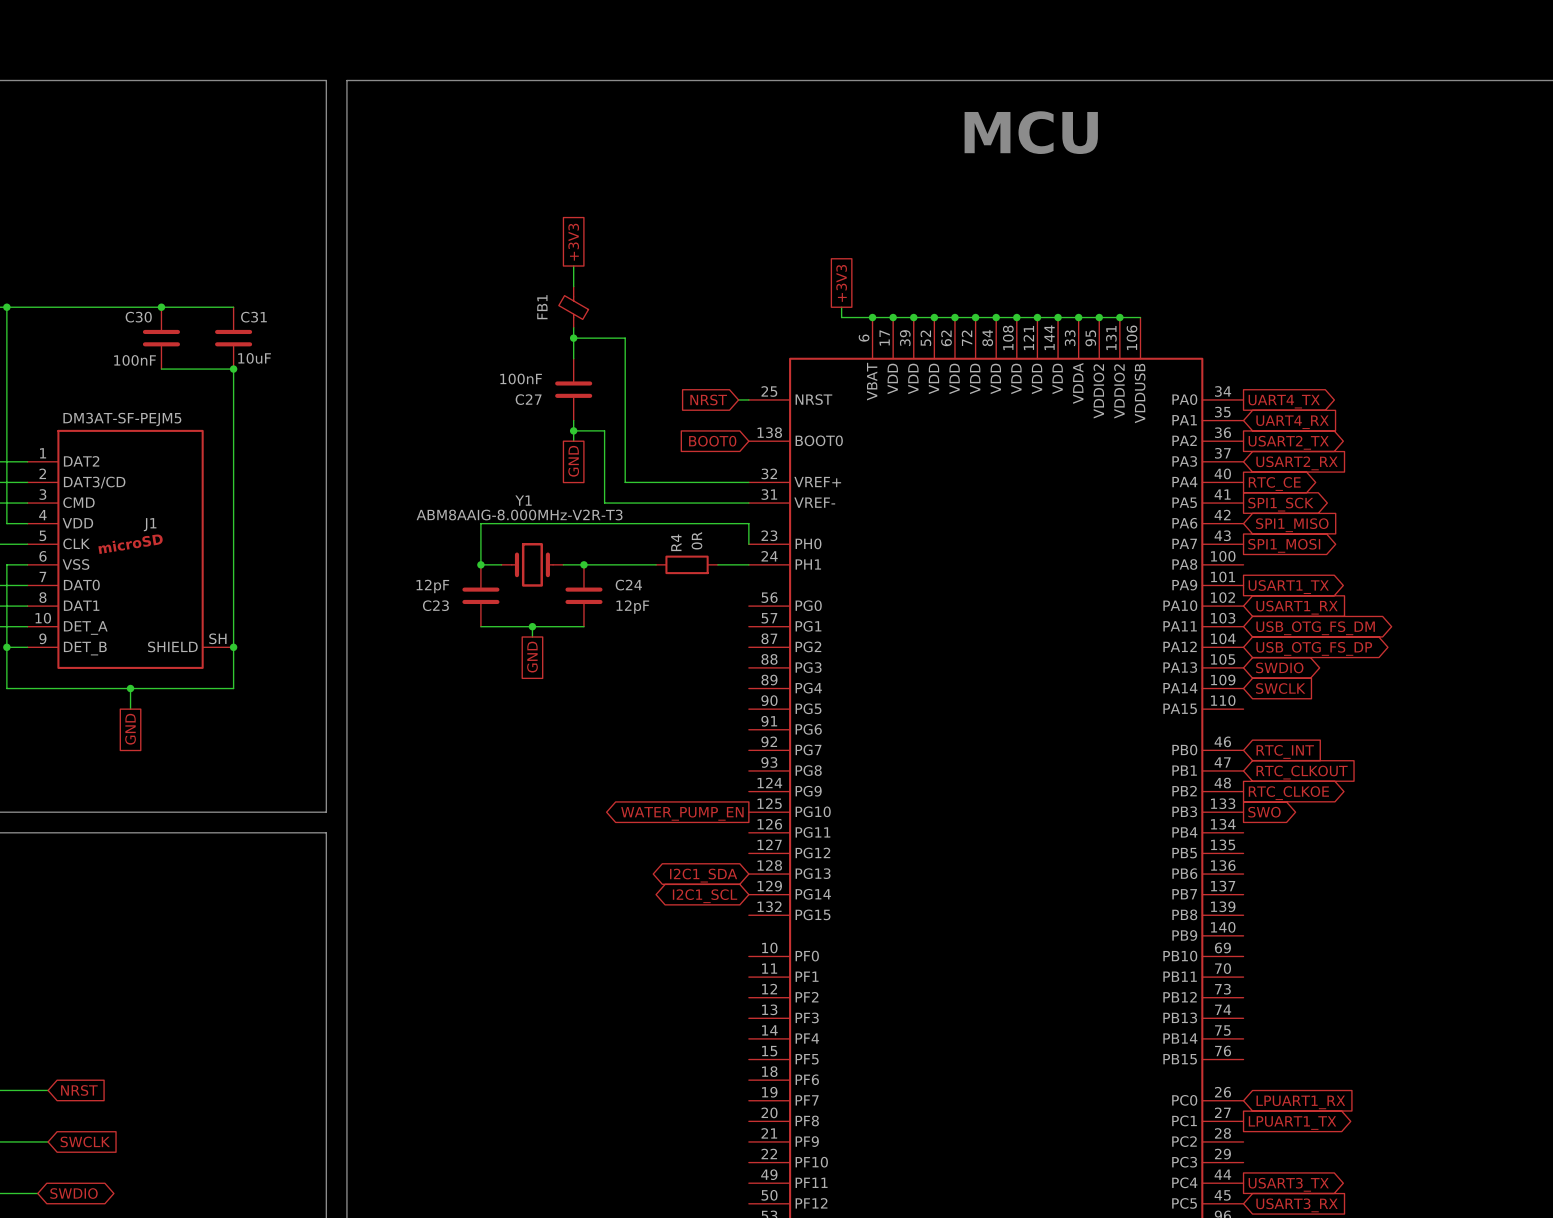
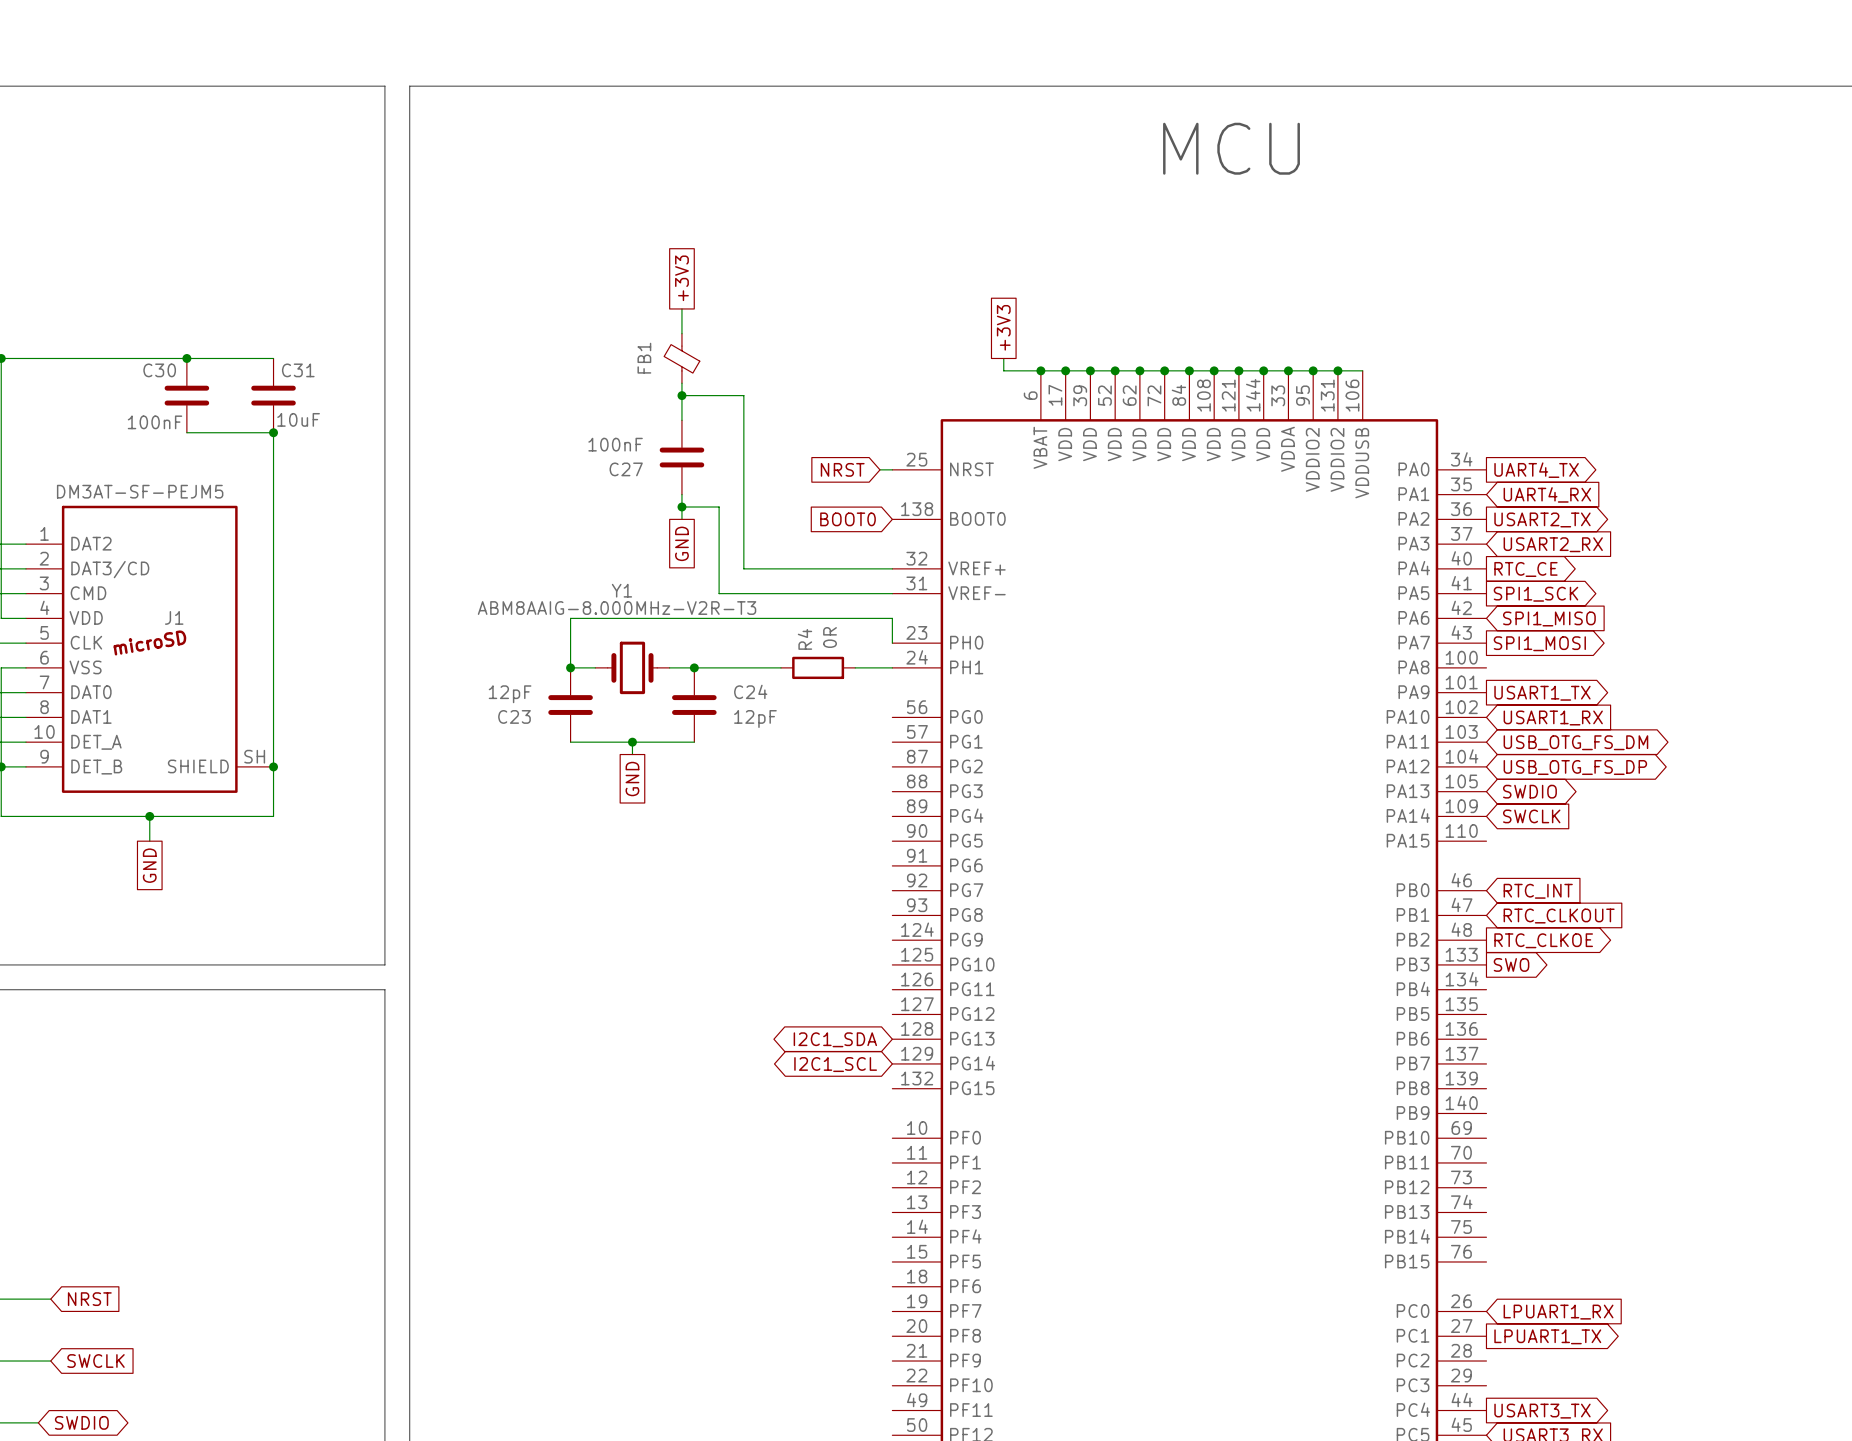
global label: WATER_PUMP_EN (682, 813) -> none

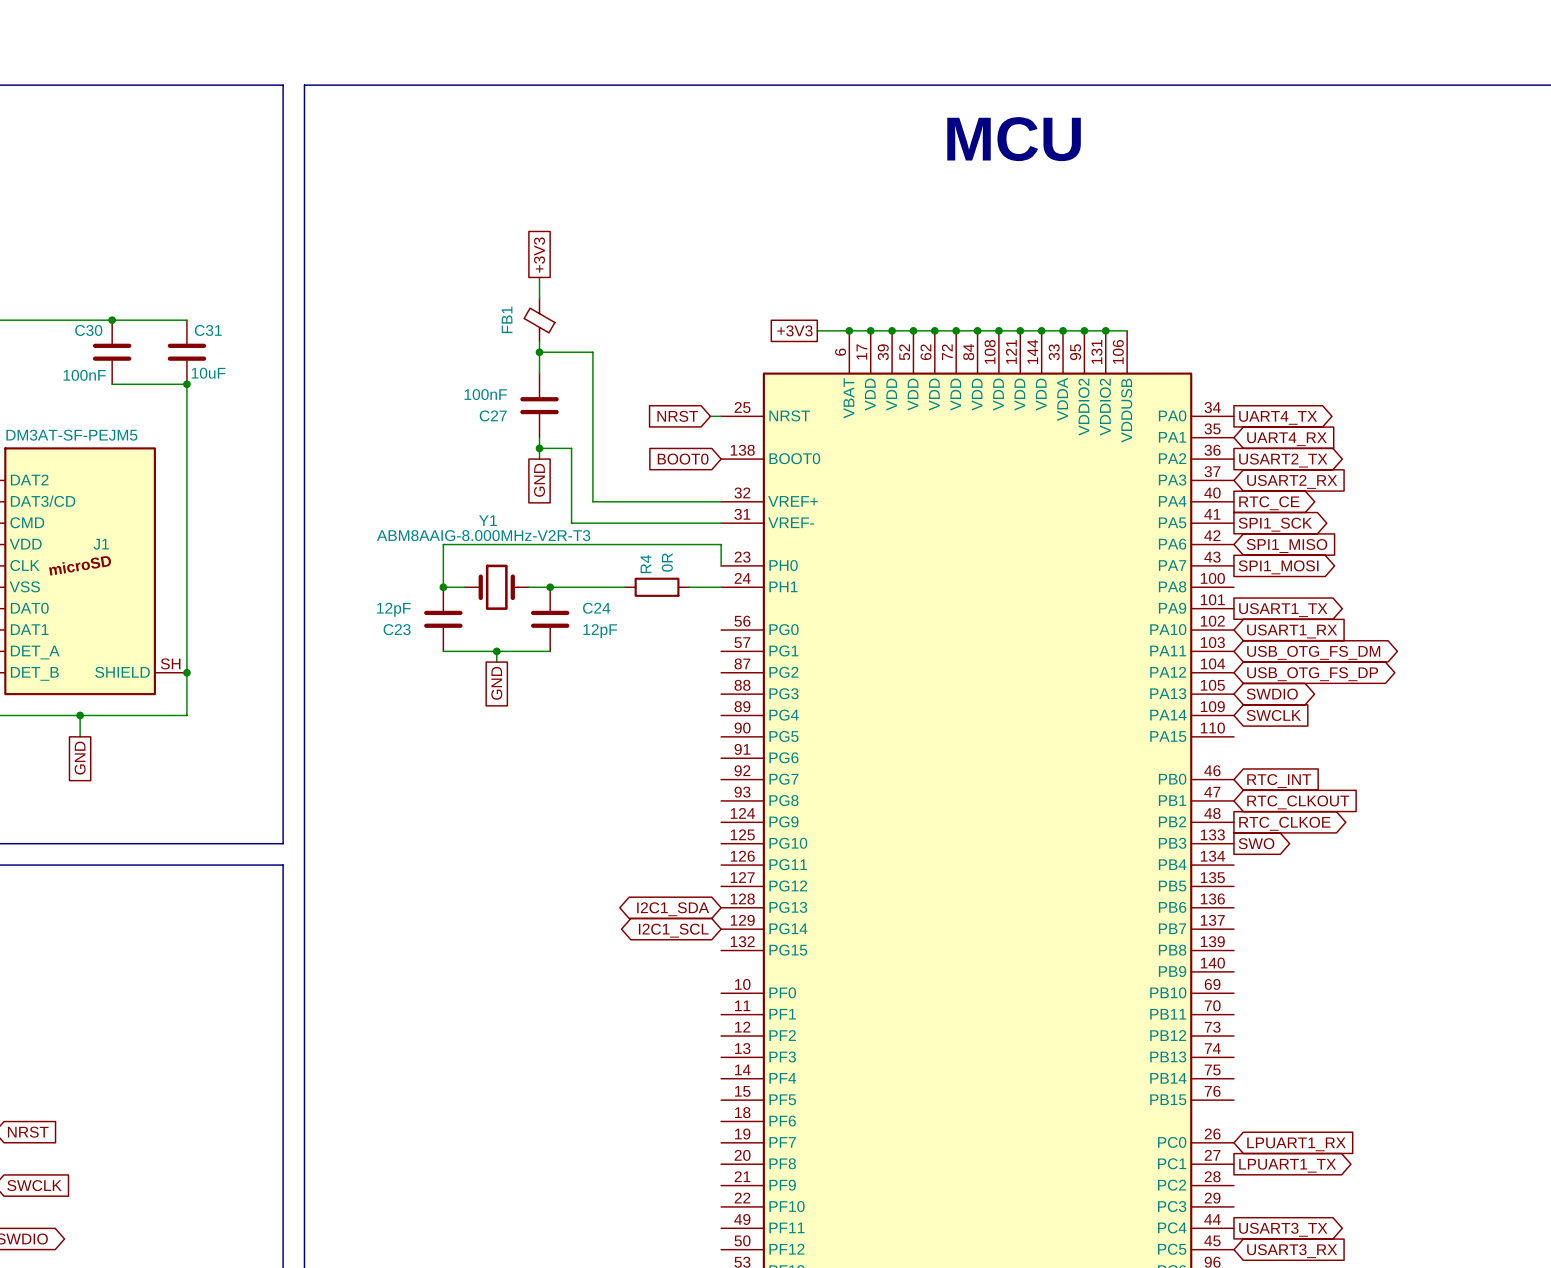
global label rotation: 0° (1003, 327) -> 90° counterclockwise (794, 330)

